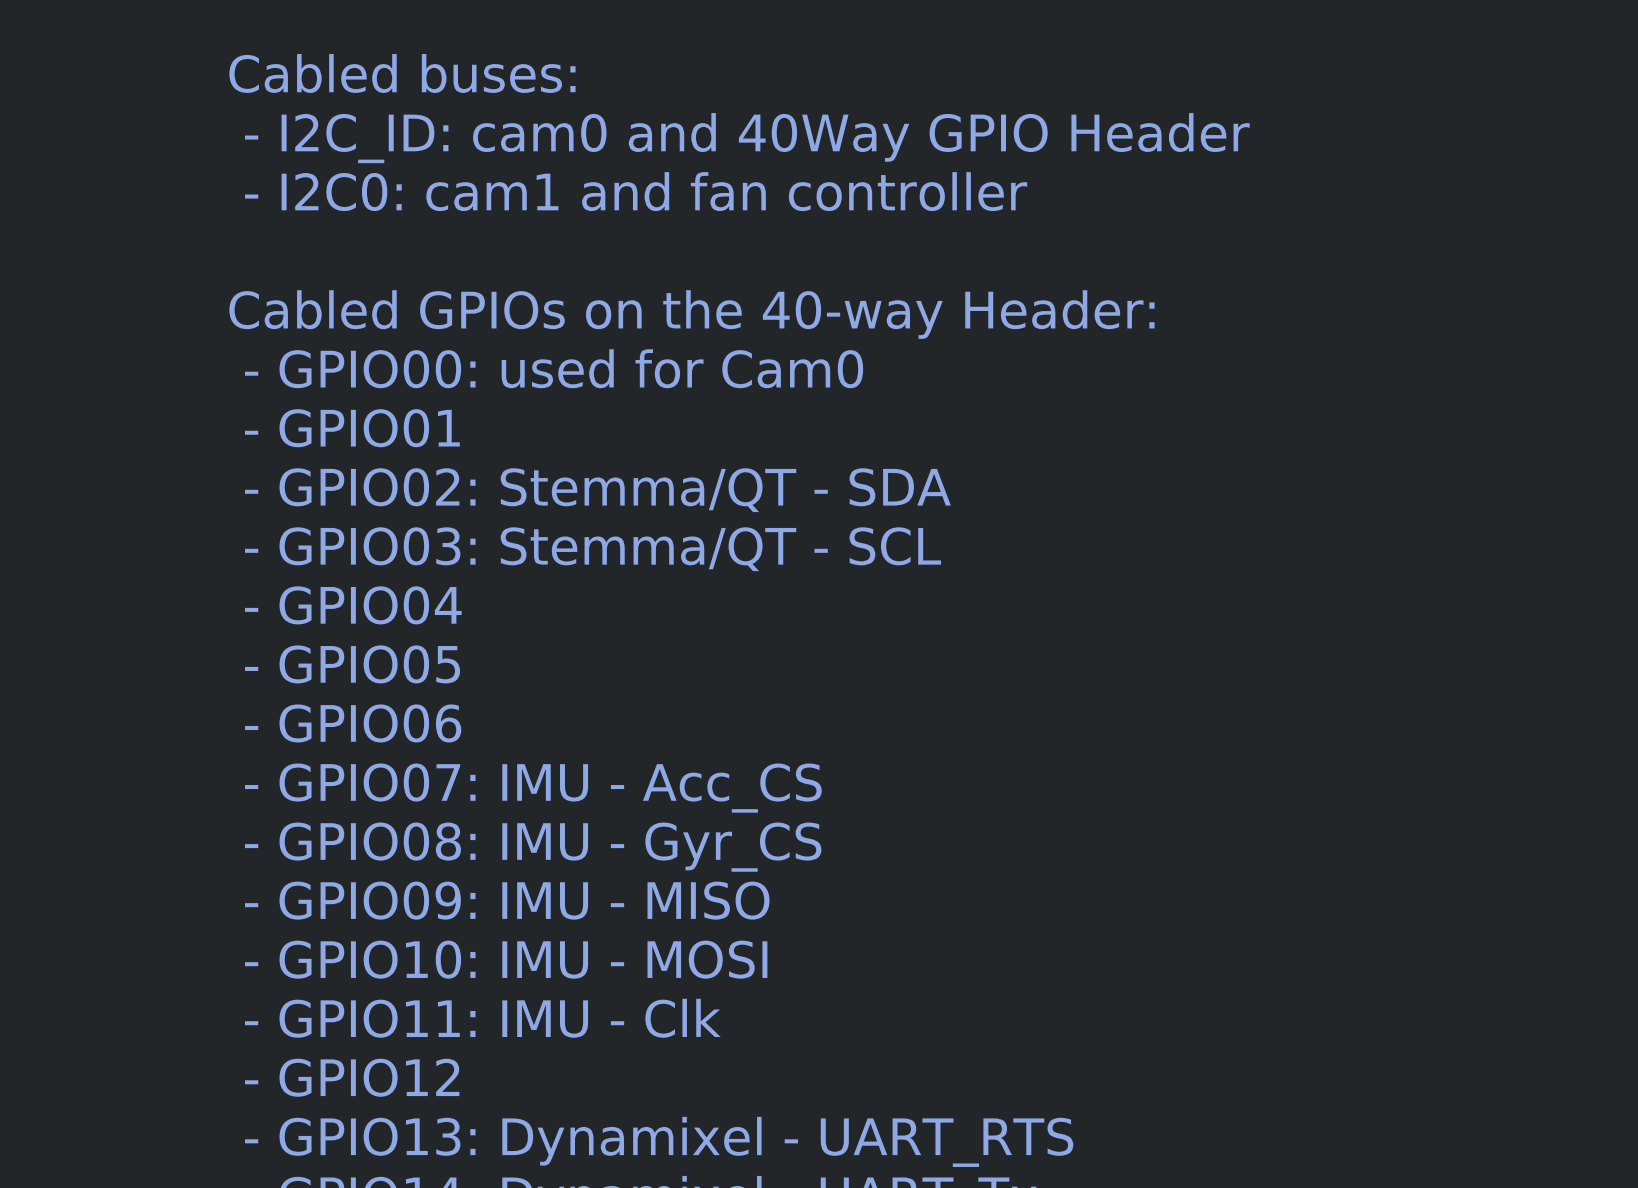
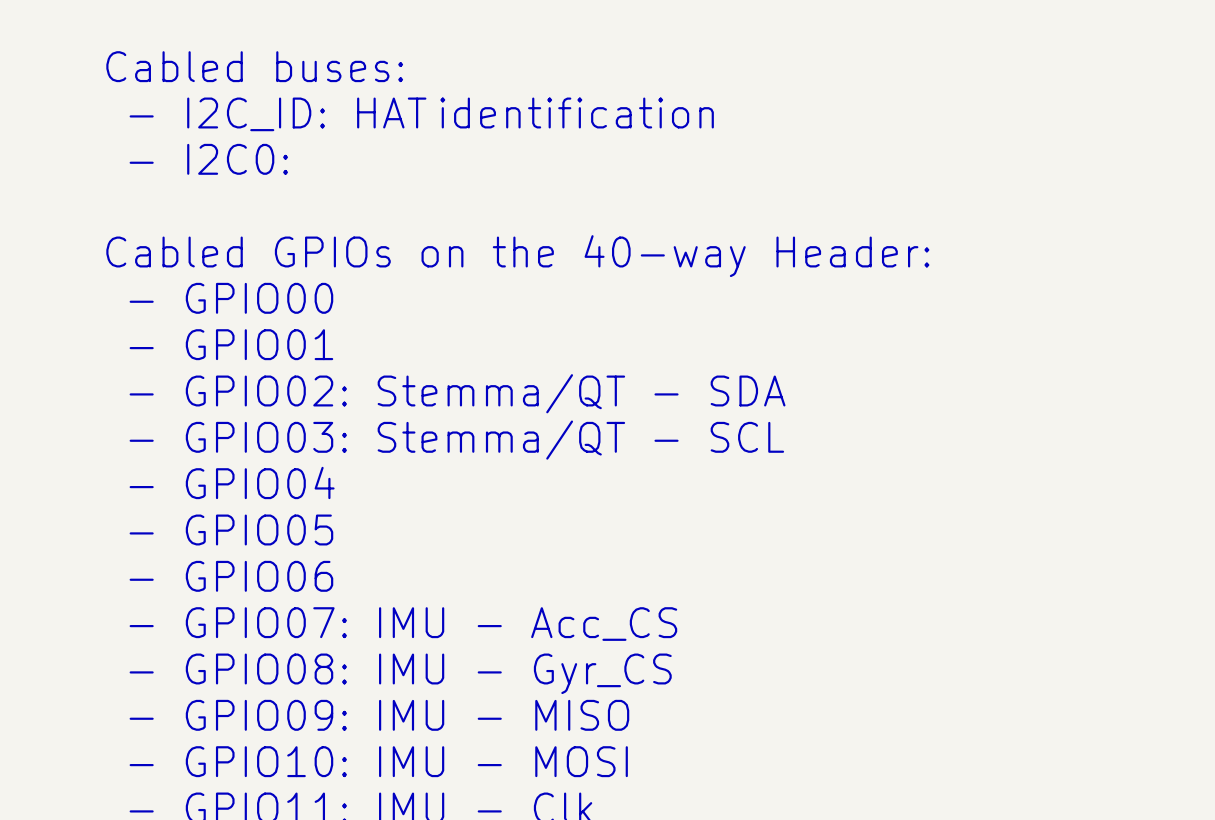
text: - I2C_ID: cam0 and 40Way GPIO Header (747, 138) -> - I2C_ID: HAT identification (421, 114)
text: - I2C0: cam1 and fan controller (636, 191) -> - I2C0: (208, 159)
text: - GPIO00: used for Cam0 (554, 368) -> - GPIO00 (231, 298)

